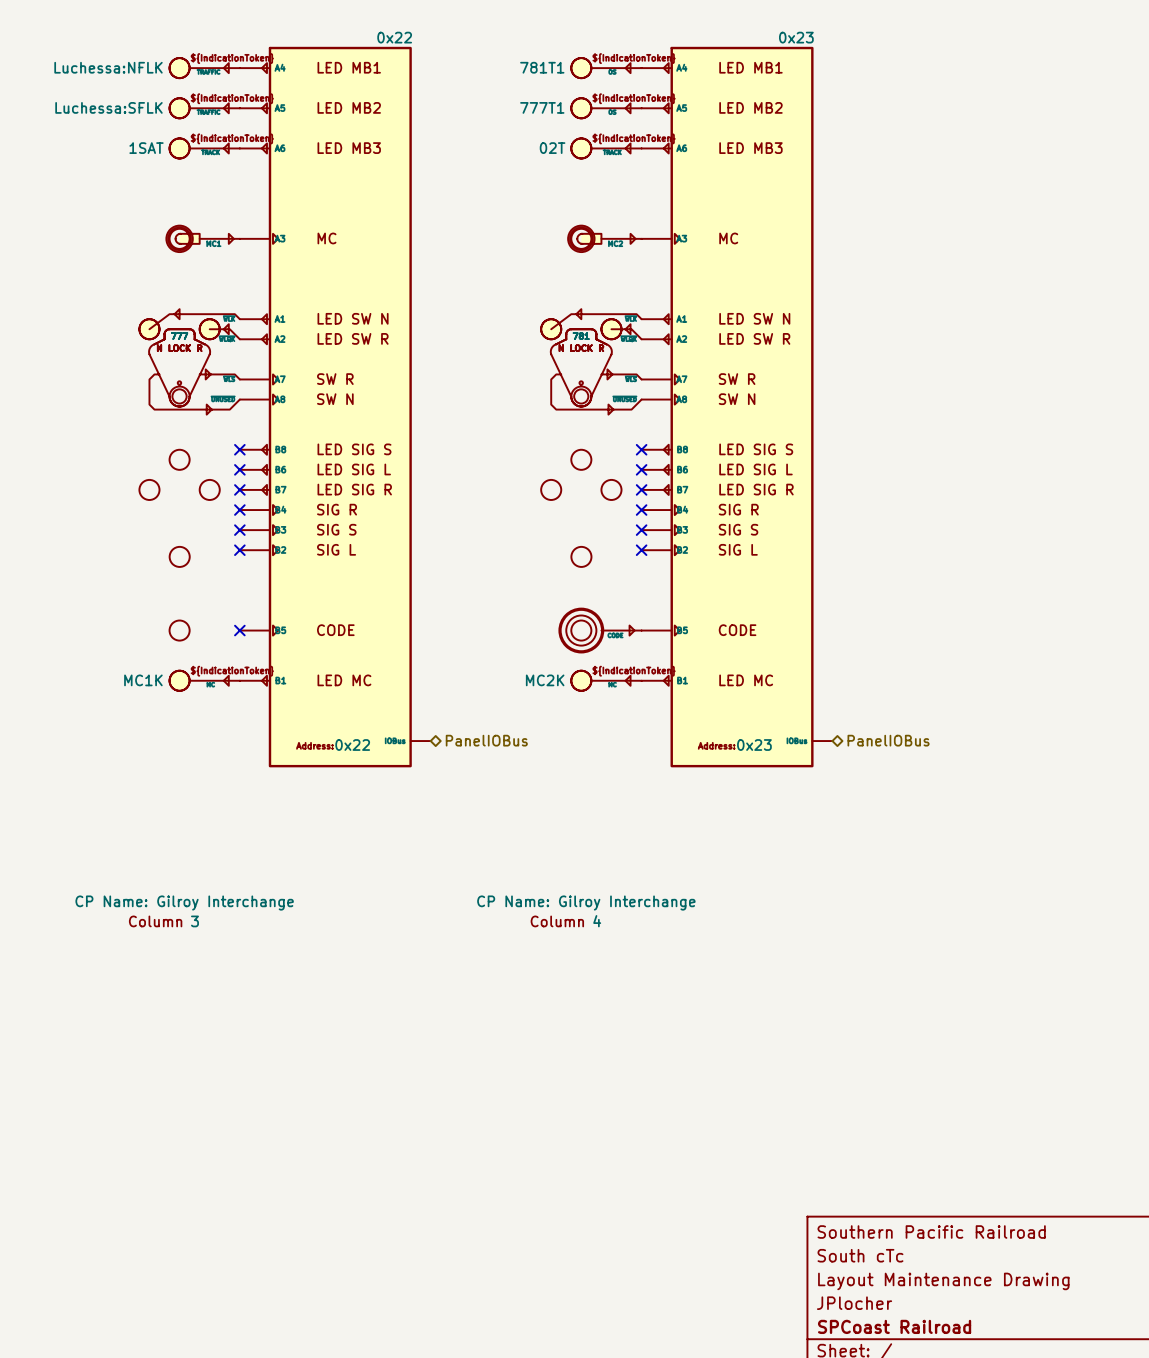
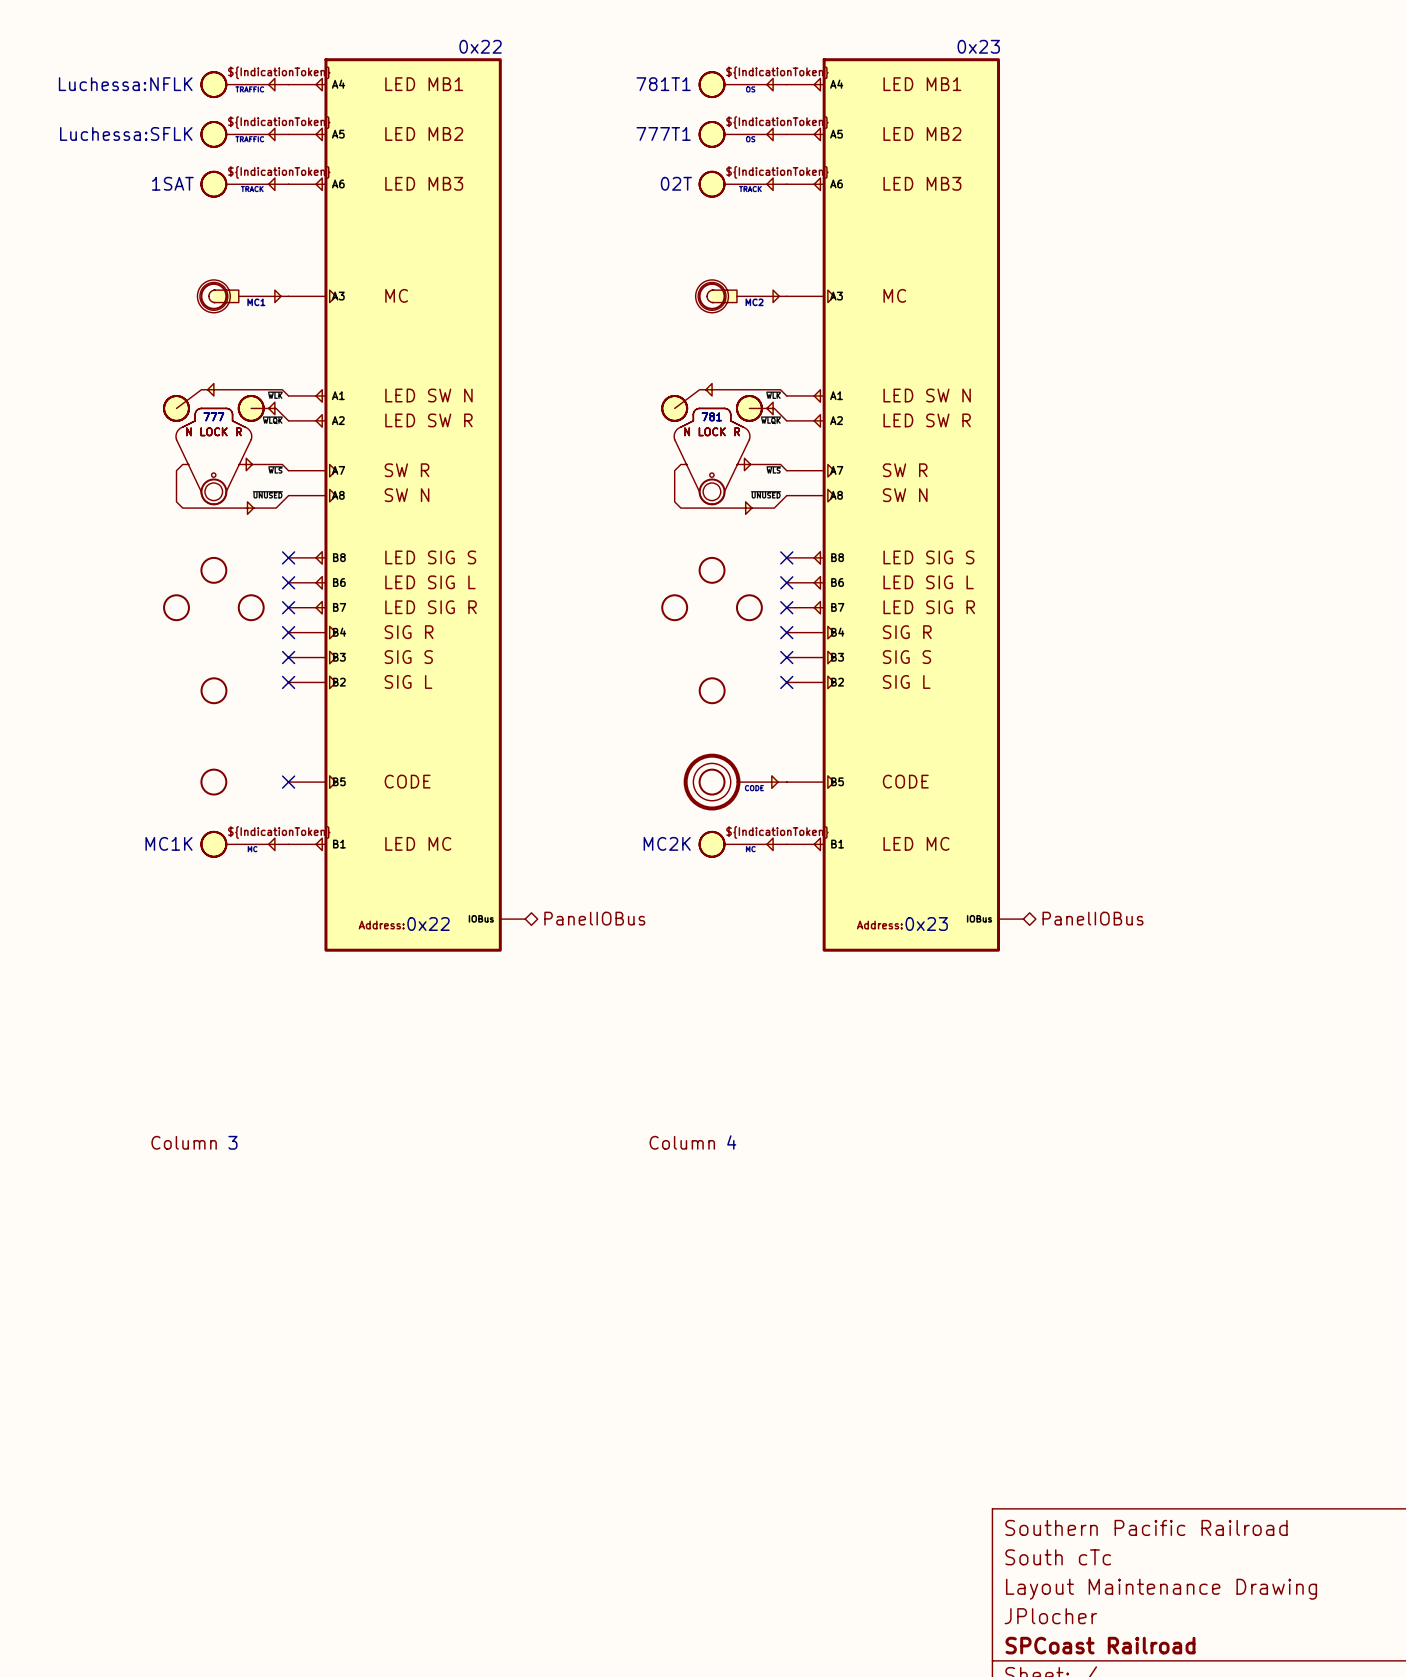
part text: CP Name: Gilroy Interchange (184, 903) -> none
part text: CP Name: Gilroy Interchange (586, 903) -> none

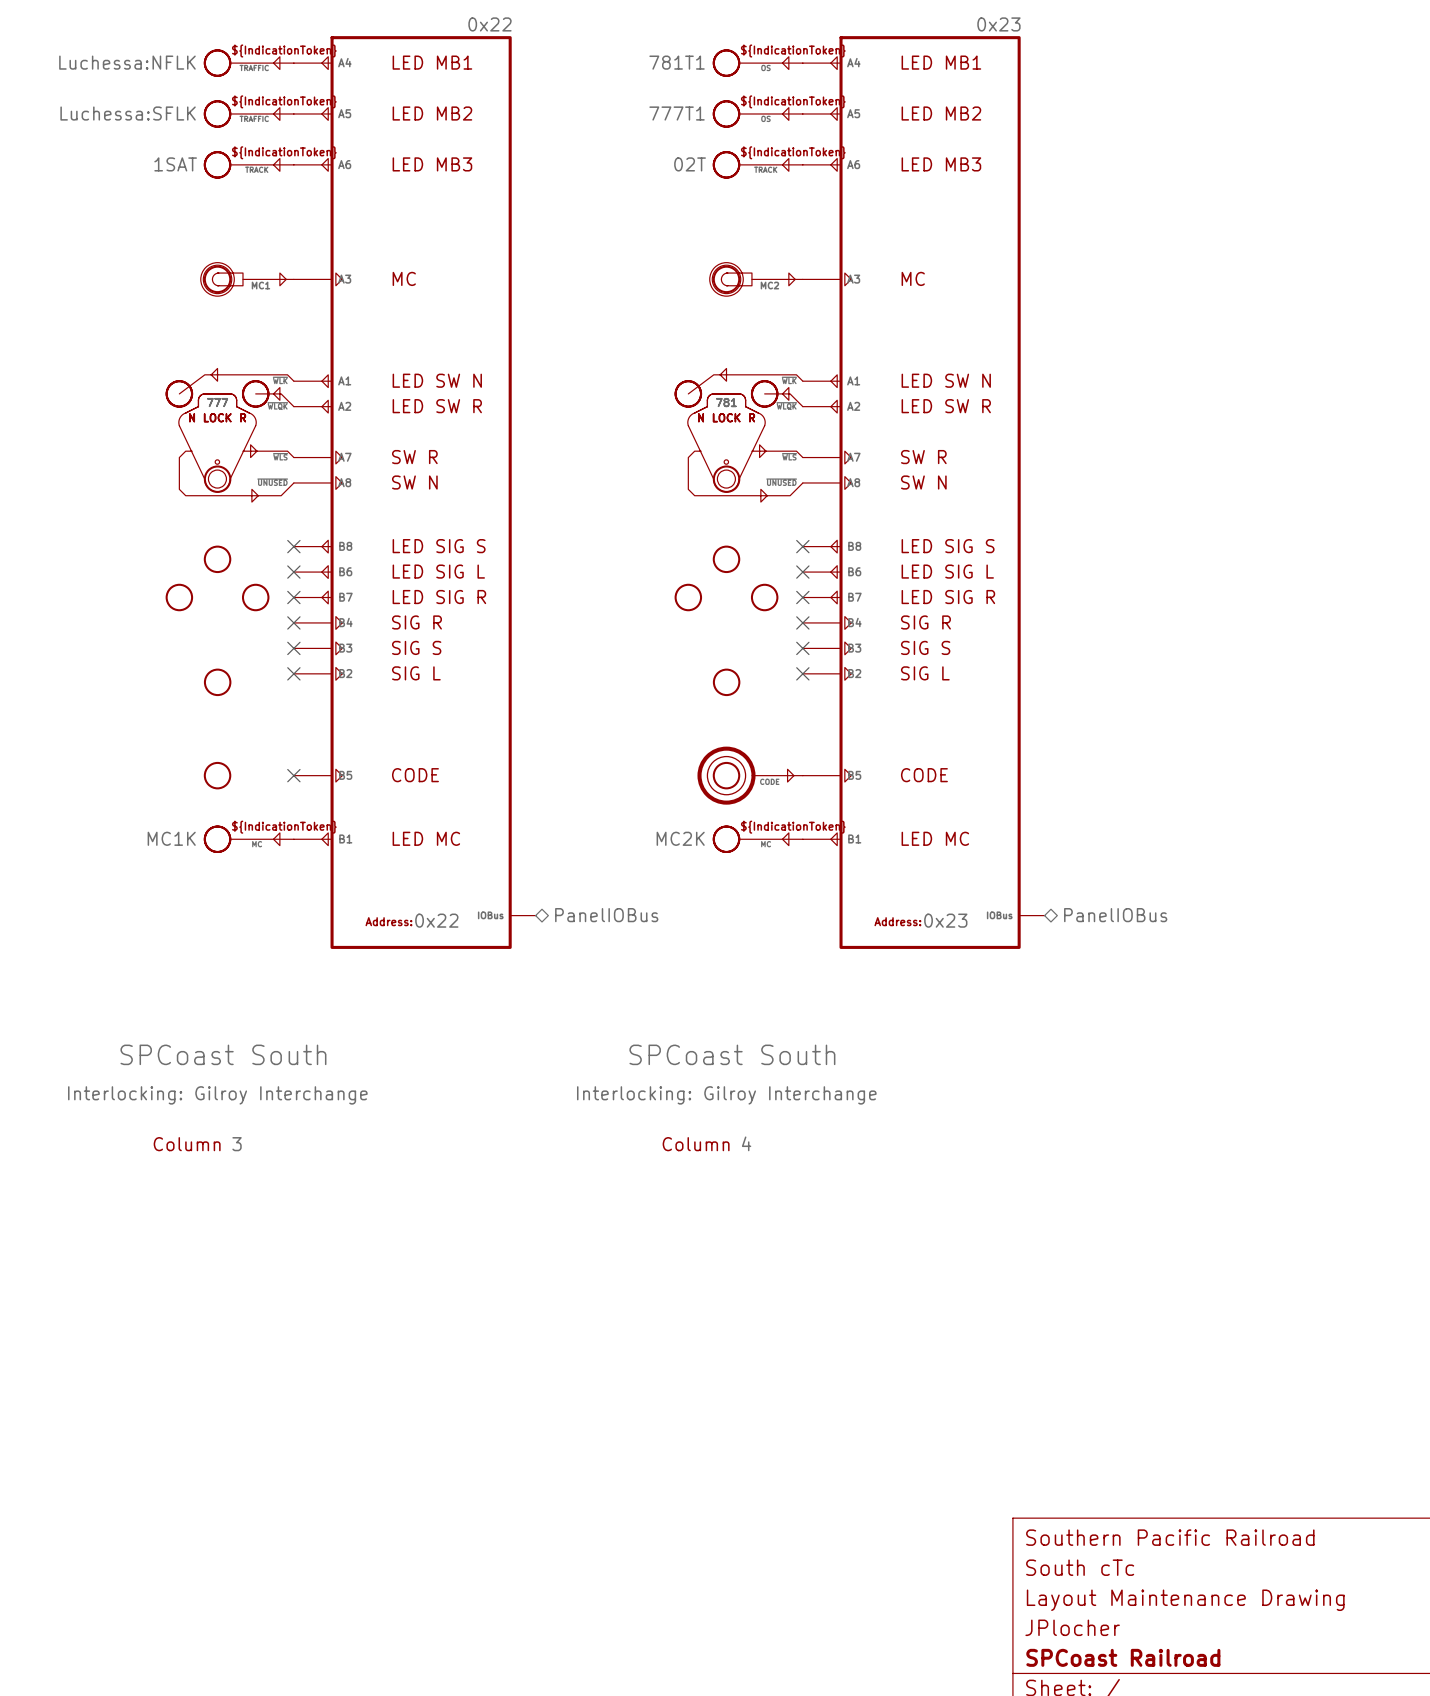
part text: none -> SPCoast South (223, 1054)
part text: none -> SPCoast South (732, 1054)
part text: none -> Interlocking: Gilroy Interchange (217, 1095)
part text: none -> Interlocking: Gilroy Interchange (726, 1095)

